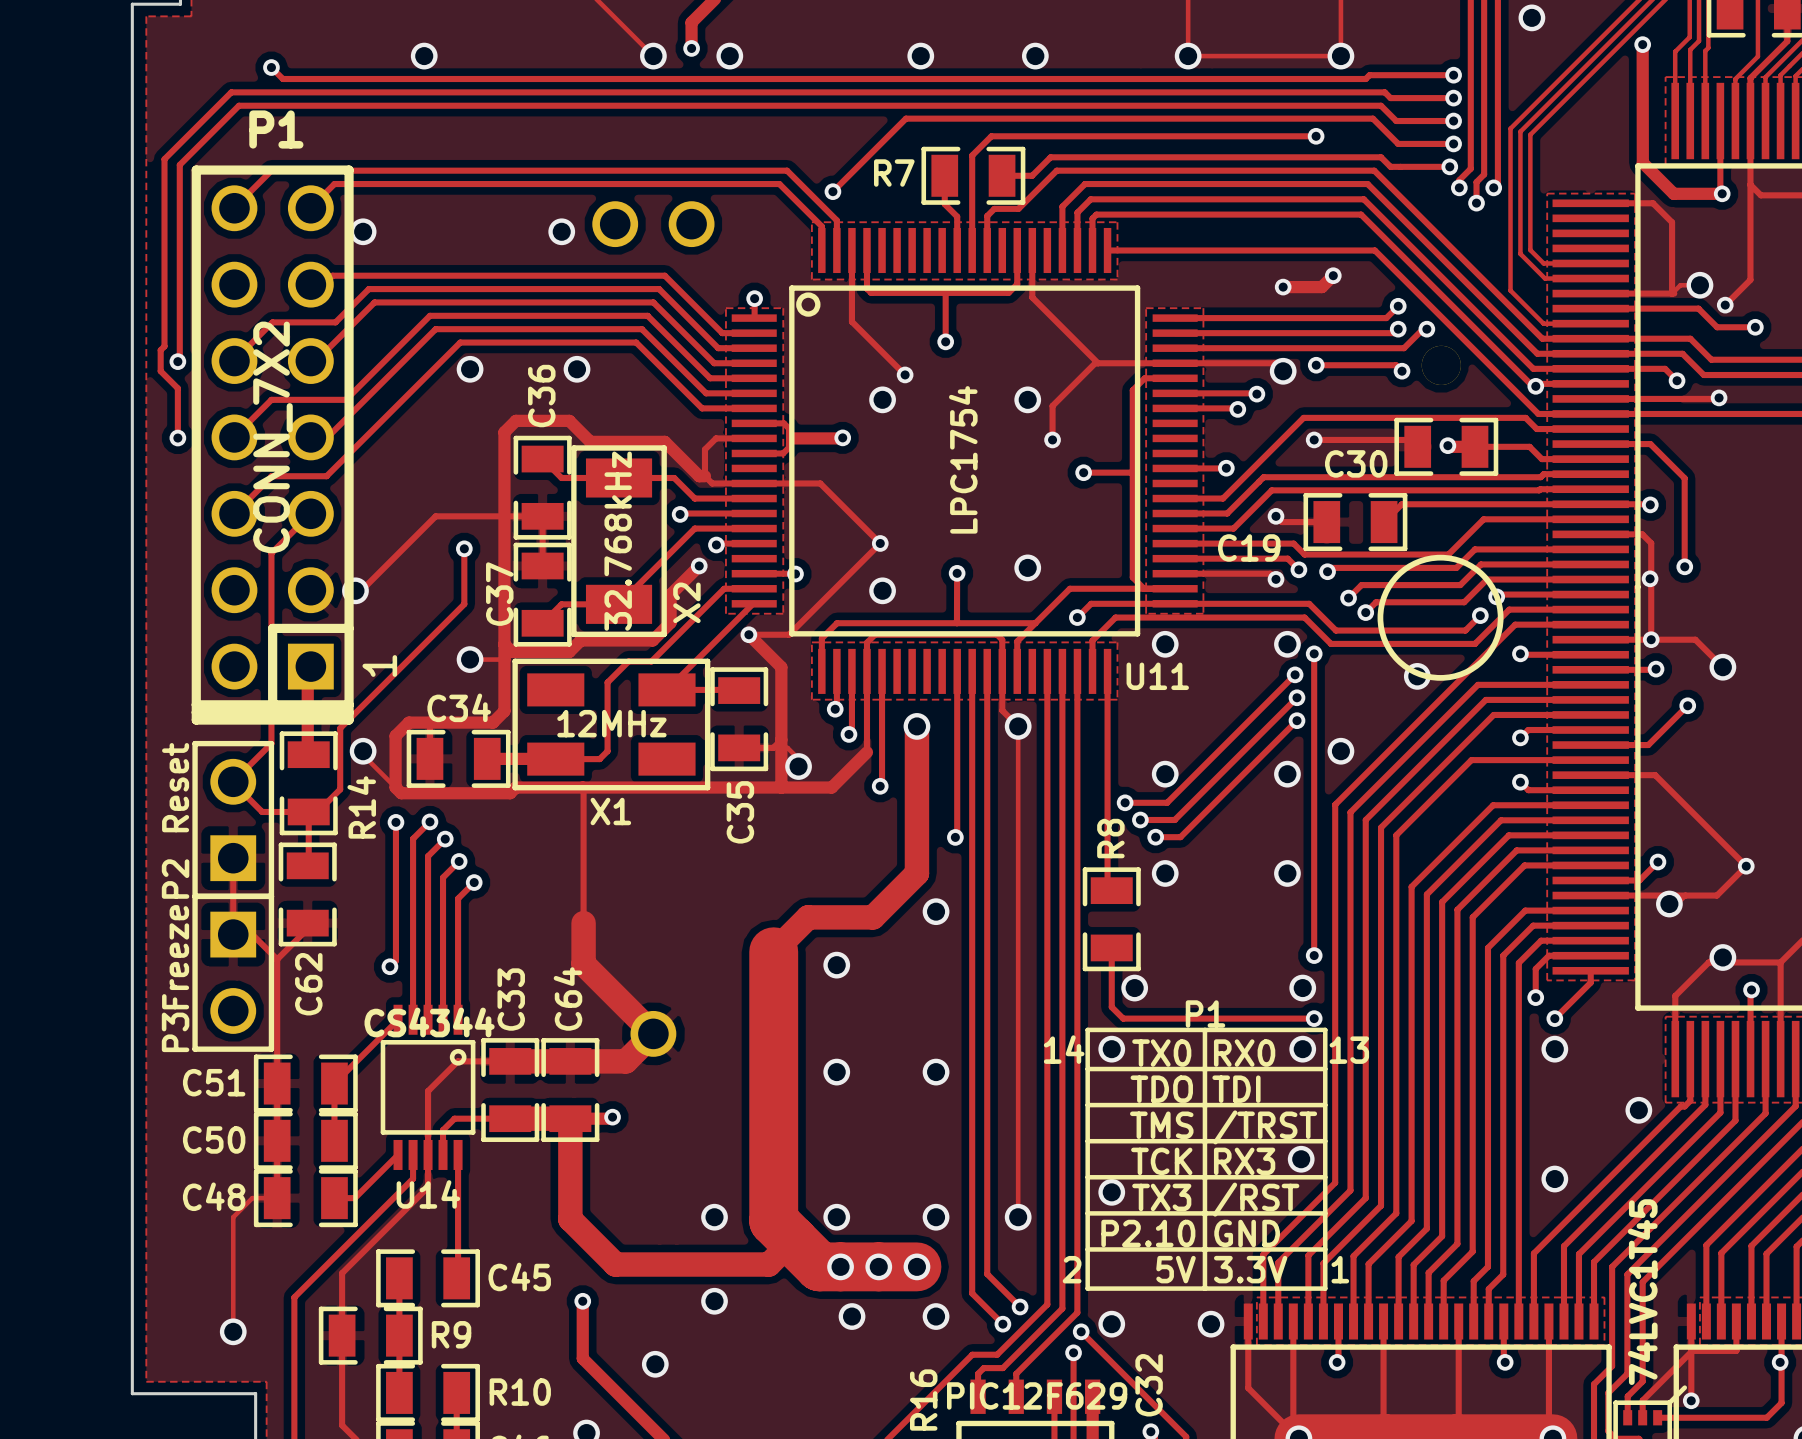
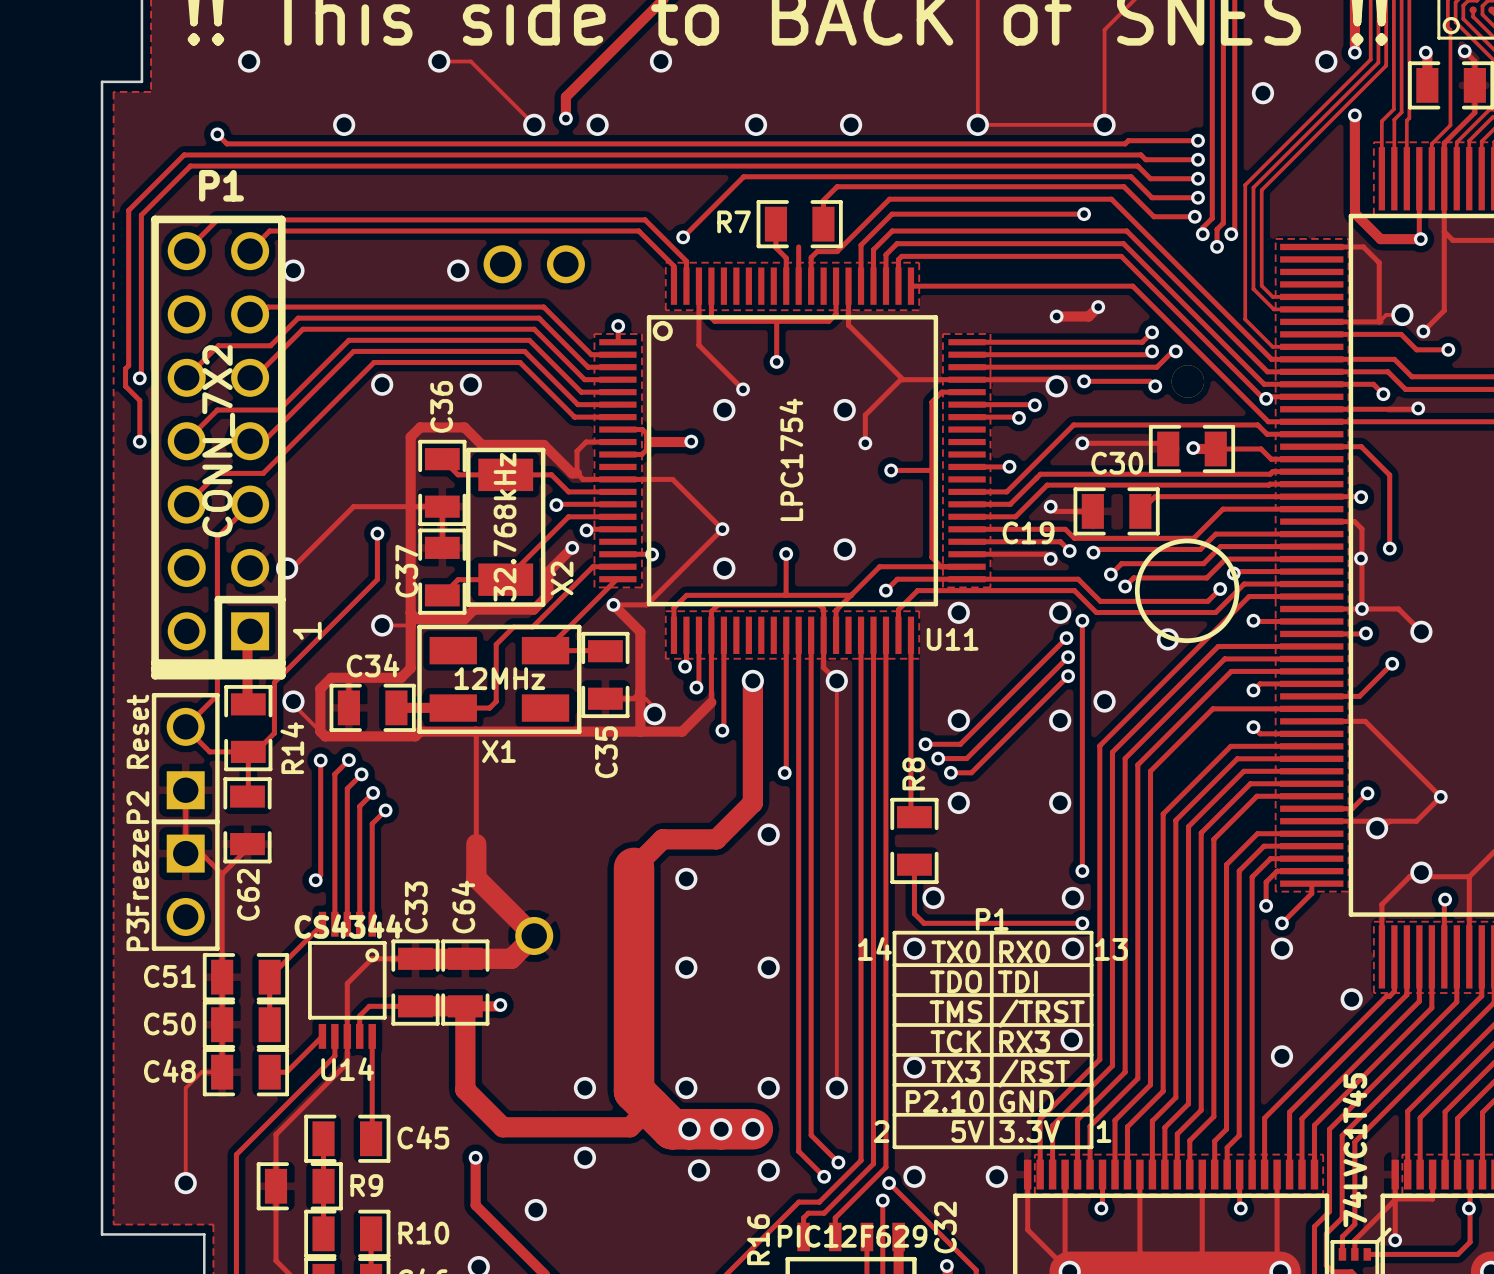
track: (1316, 136) (991, 136) (972, 155) (972, 203) -> none
via position: (1316, 136) -> (1084, 214)
track: none -> (1084, 214) (892, 214) (861, 245) (861, 286)
track: (1400, 166) (1390, 166) (1381, 157) (1050, 157) (1032, 175) (1002, 175) -> (1153, 216) (1123, 186) (837, 186) (823, 200) (823, 224)
track: (1056, 170) (1374, 170) -> (868, 219) (889, 199) (1111, 199) (1132, 219)

